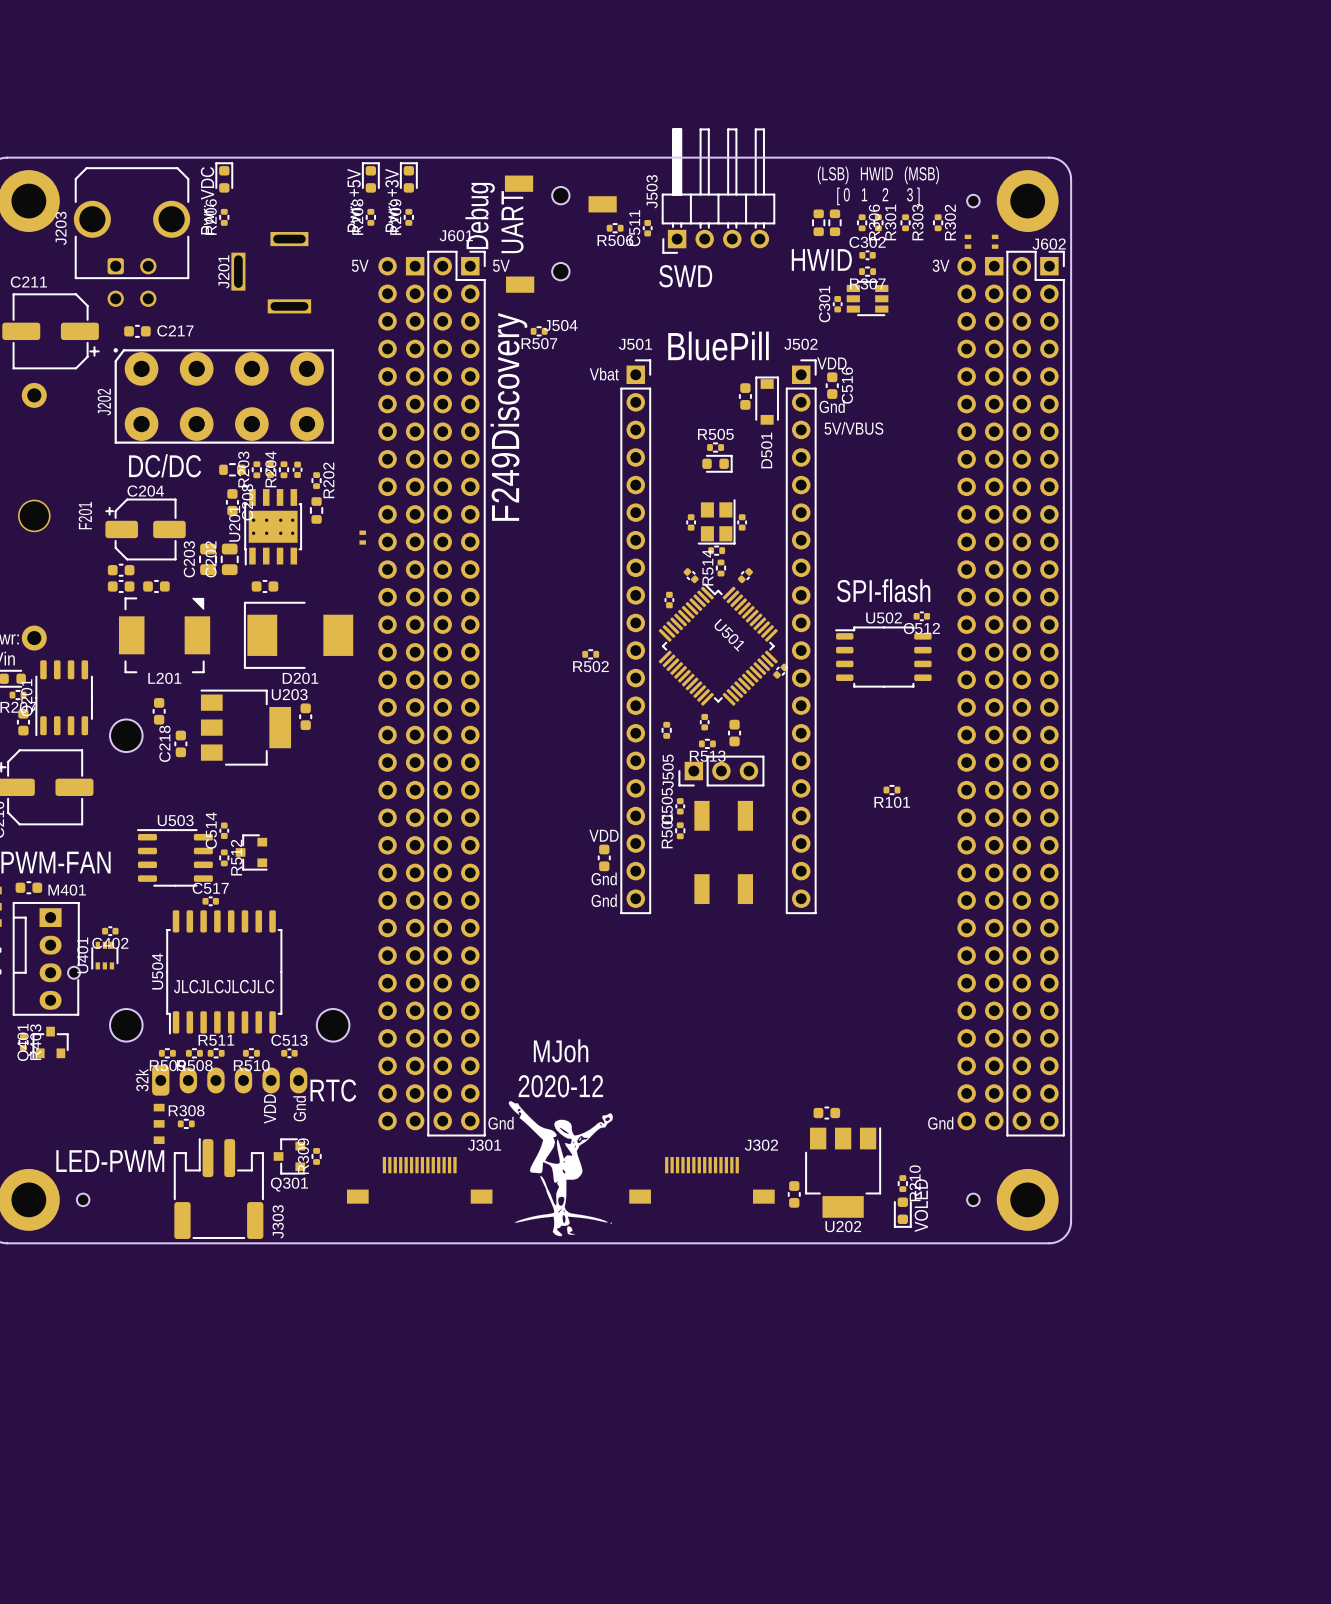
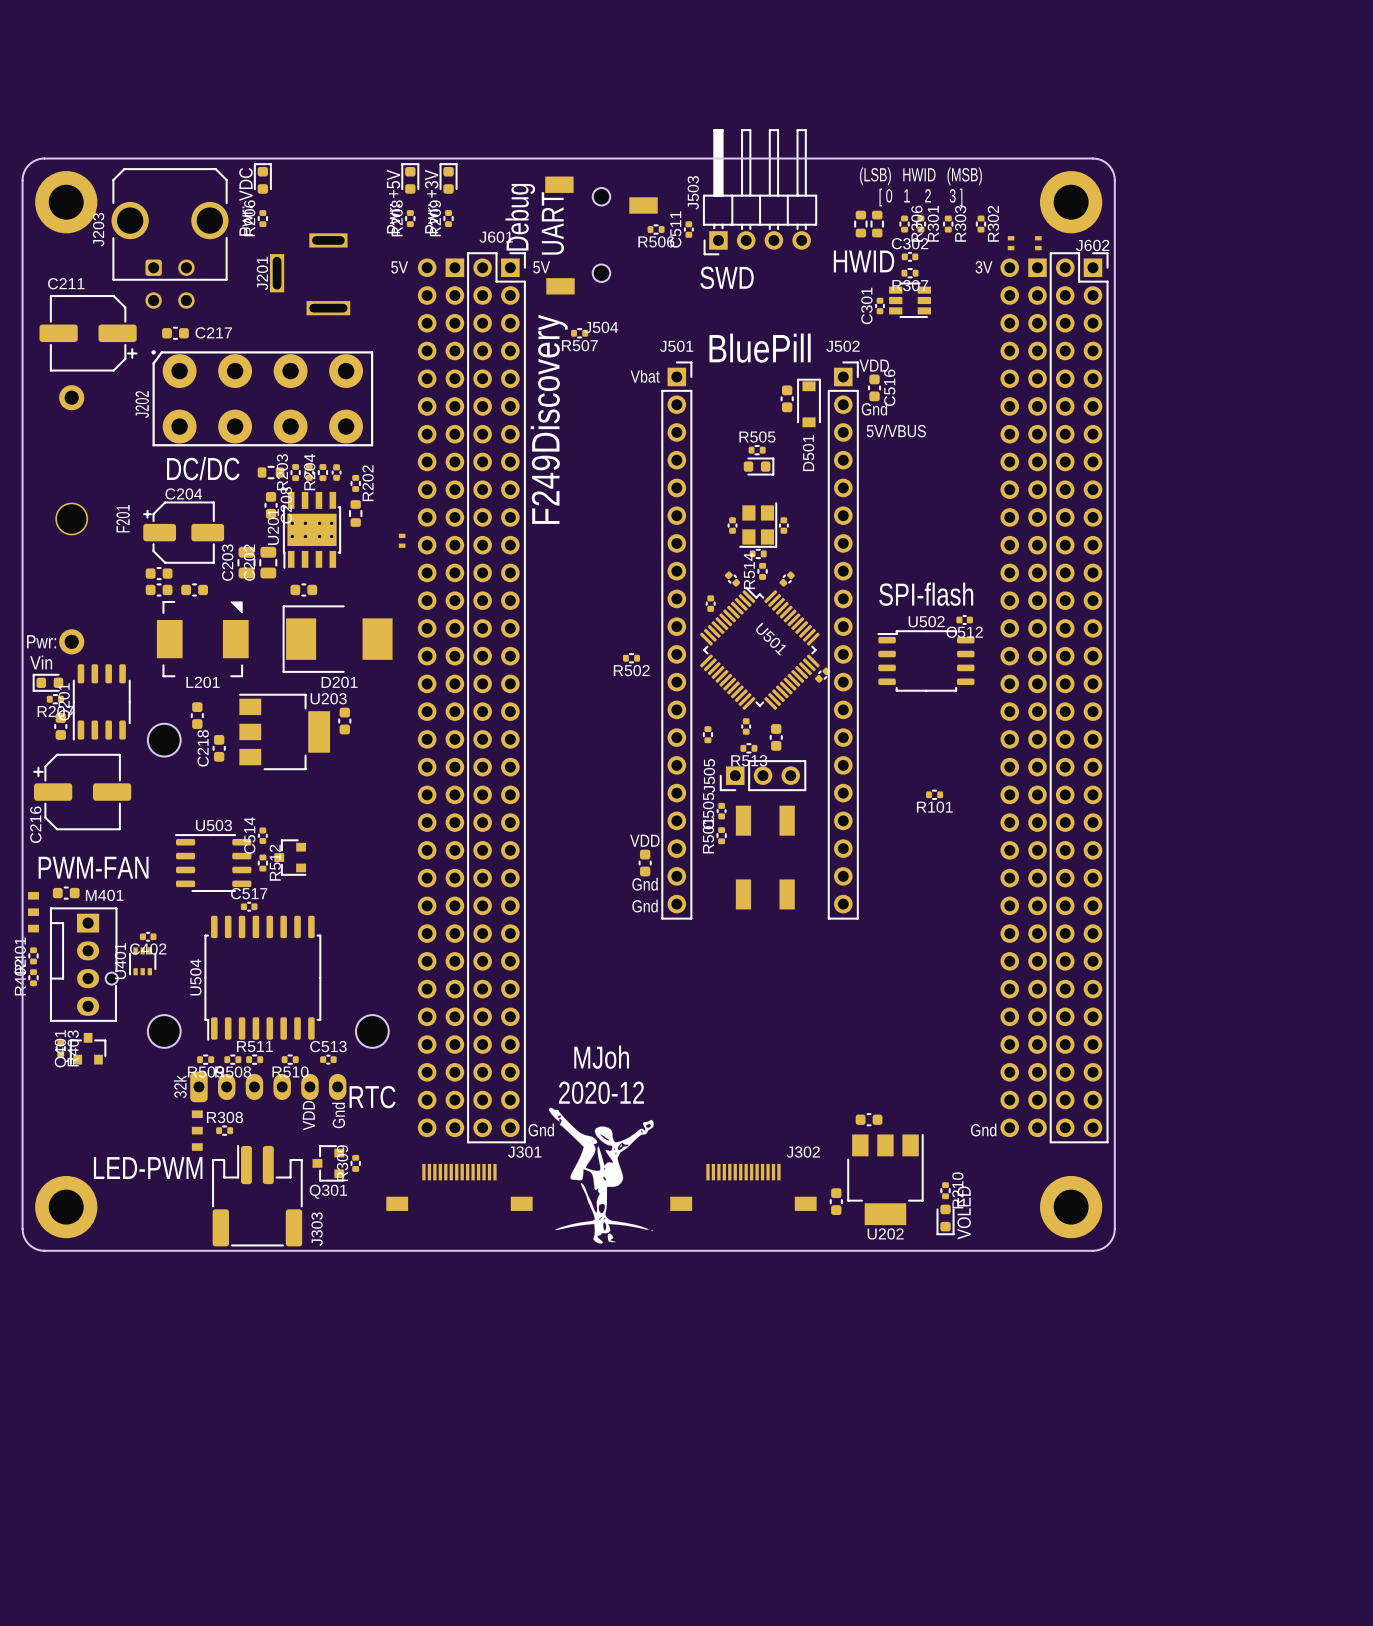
part: (973, 201) -> none
text: JLCJLCJLCJLC (224, 986) -> none
part: (83, 1199) -> none
part: (973, 1199) -> none

